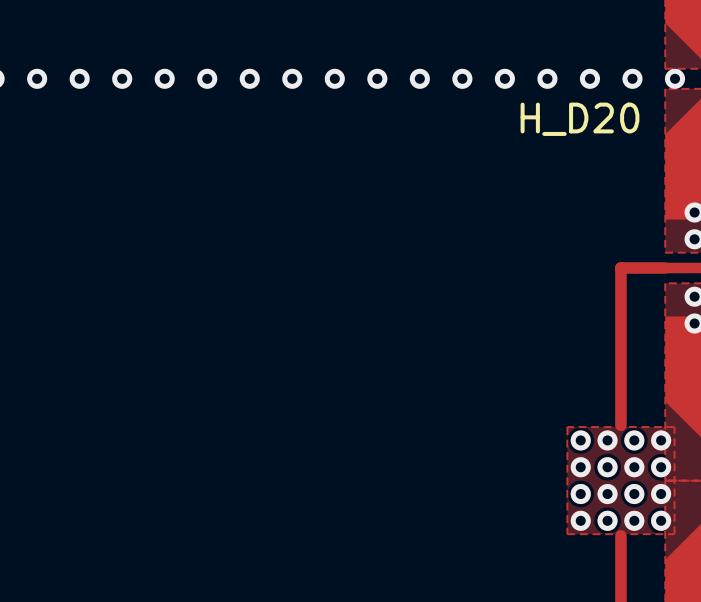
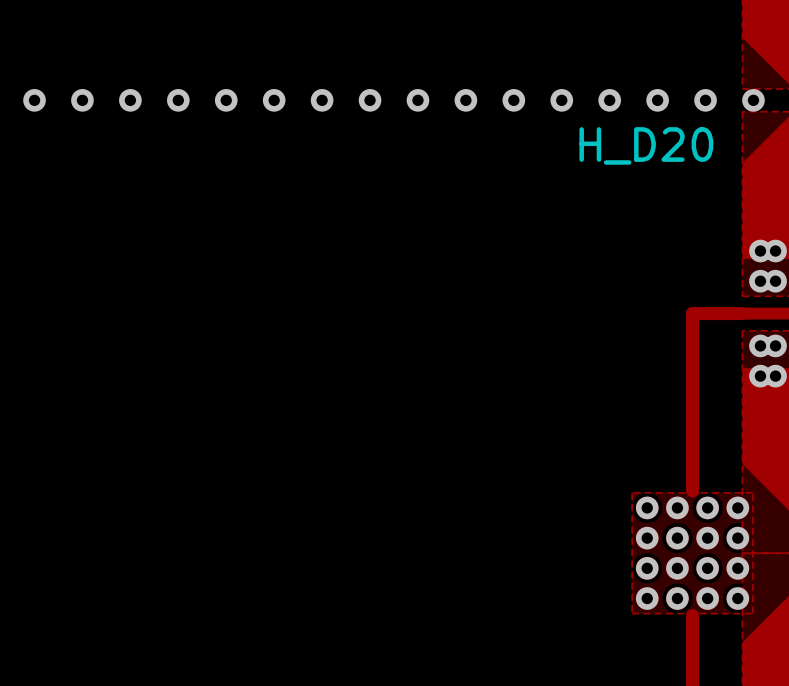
via: none -> (760, 251)
via: none -> (760, 281)
via: none -> (760, 345)
via: none -> (760, 376)

